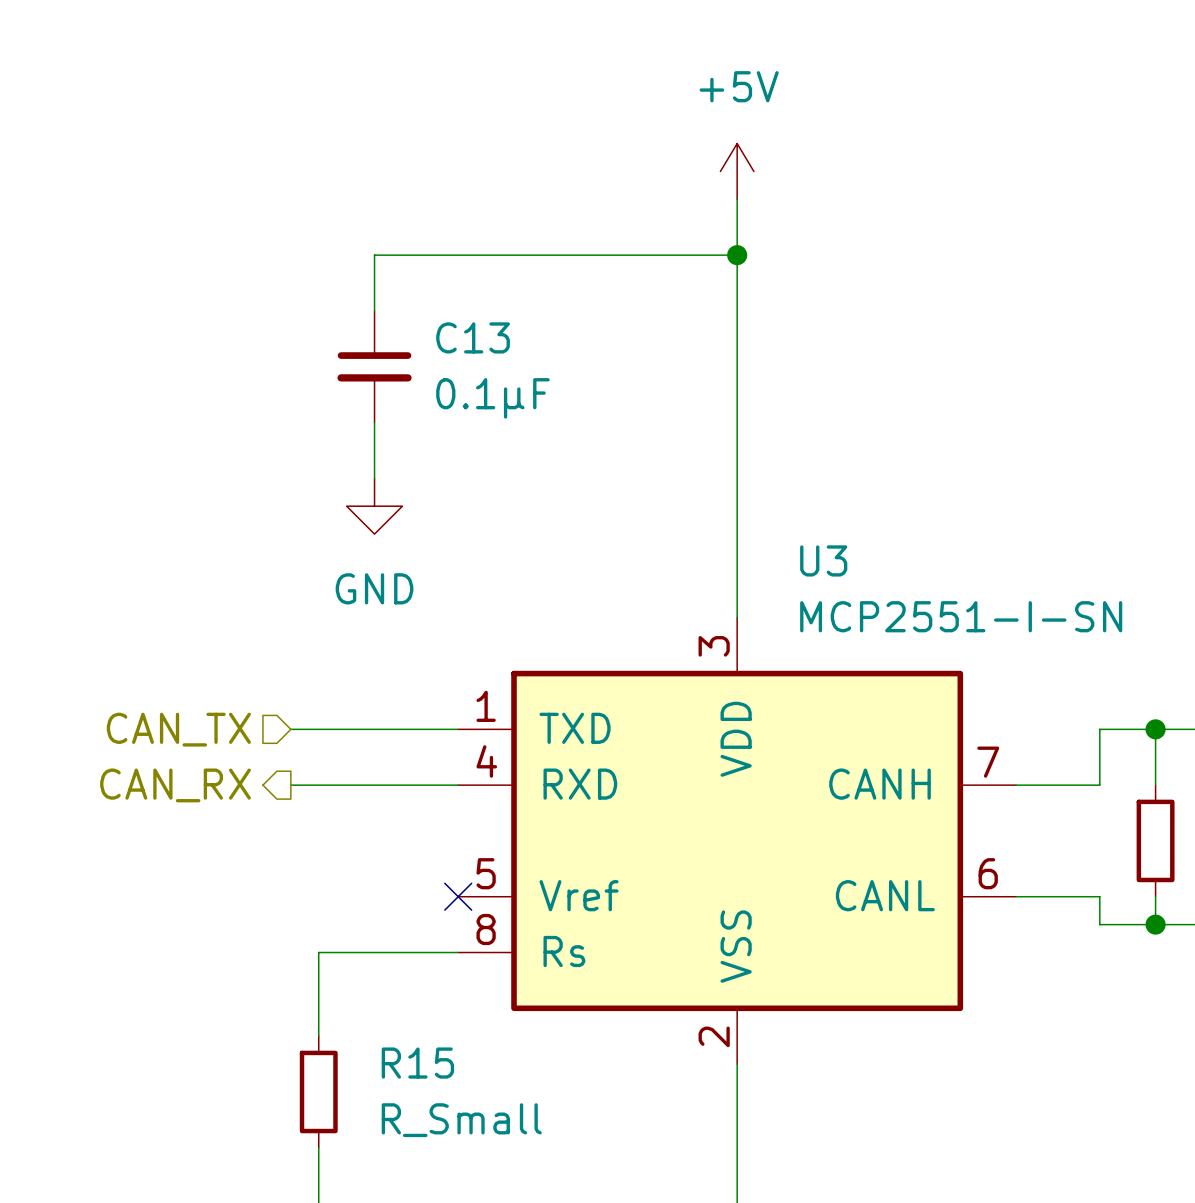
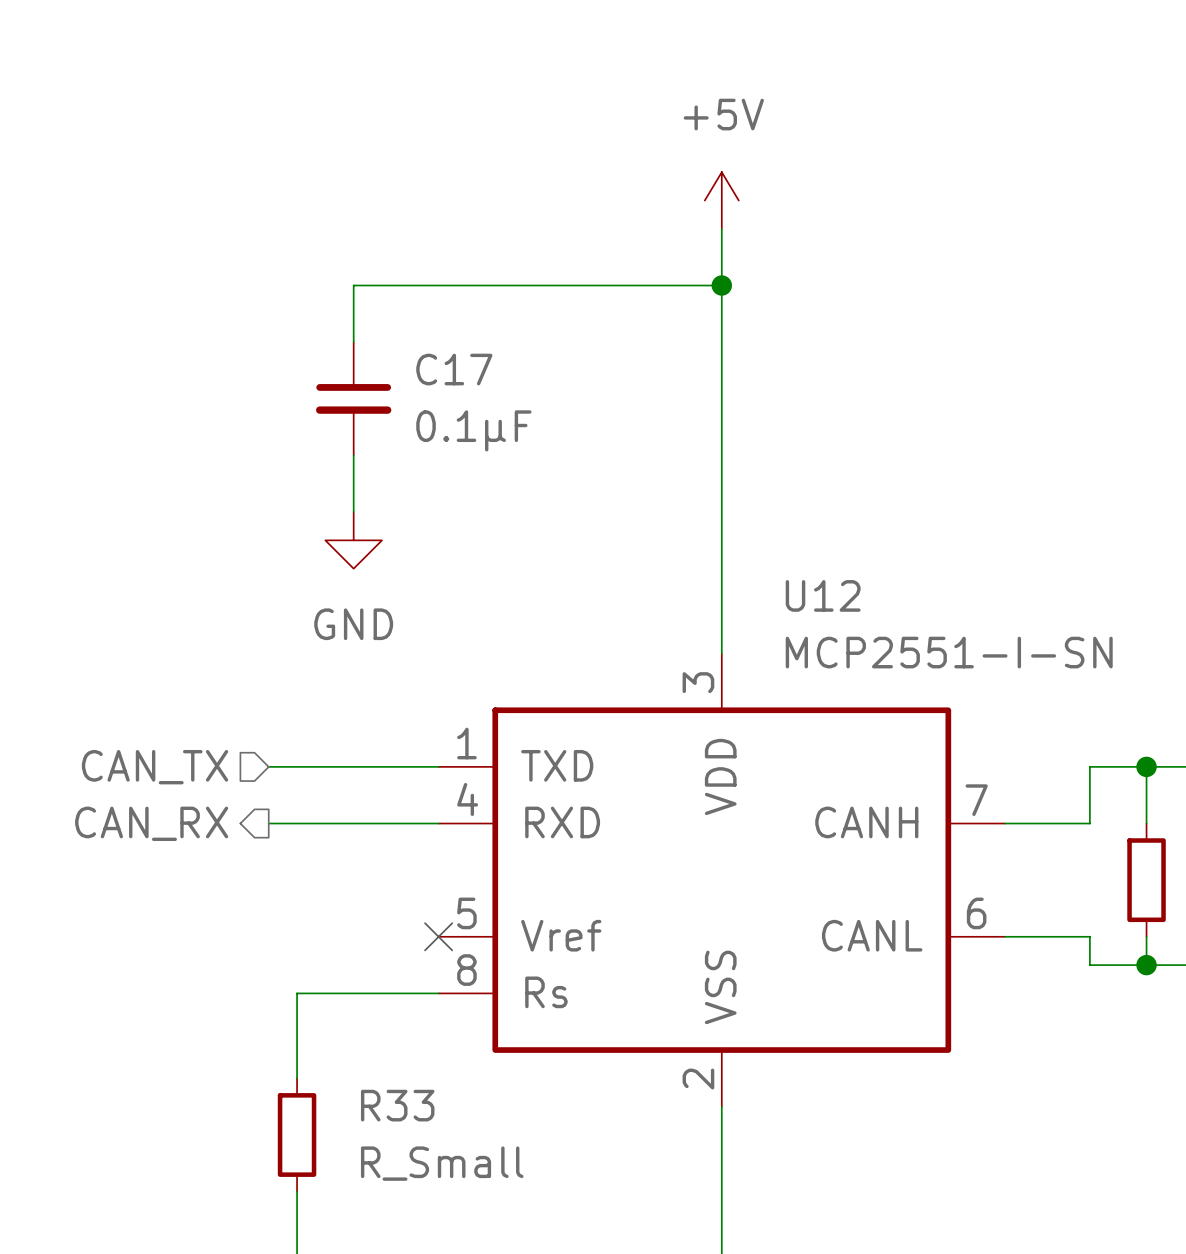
C13 name: C13 (473, 337) -> C17 (454, 369)
U3 name: U3 (823, 560) -> U12 (823, 595)
R15 name: R15 (417, 1063) -> R33 (397, 1105)

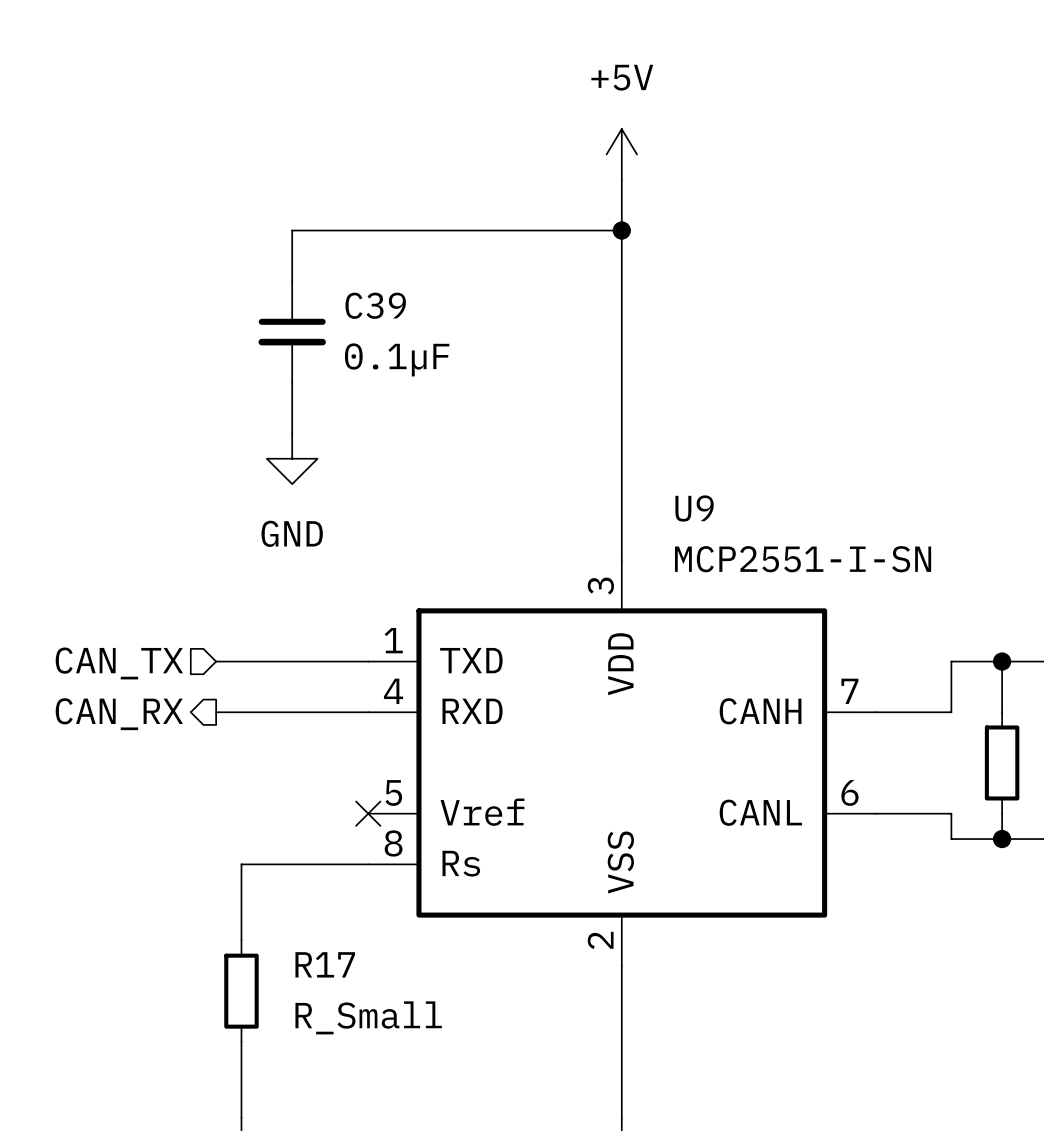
C17 name: C17 (454, 369) -> C39 (375, 305)
U12 name: U12 (823, 595) -> U9 (694, 508)
R33 name: R33 (397, 1105) -> R17 (325, 964)

